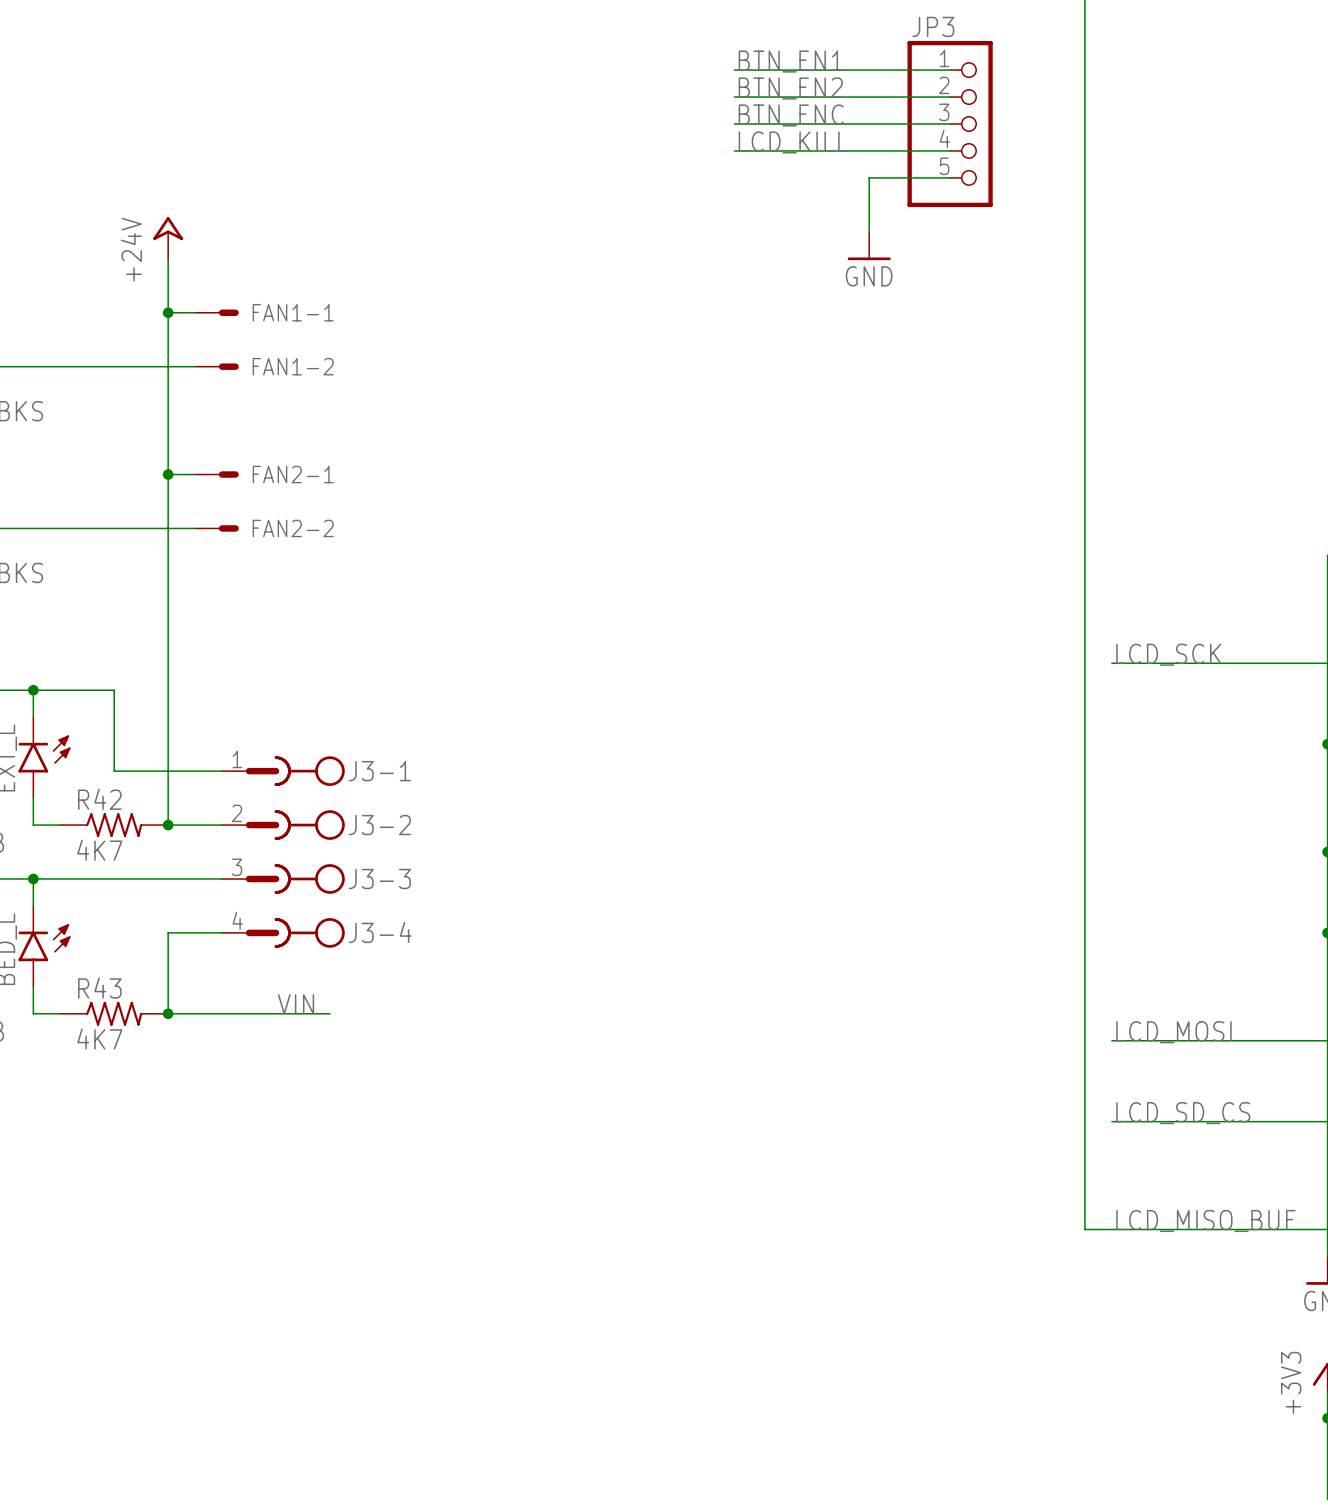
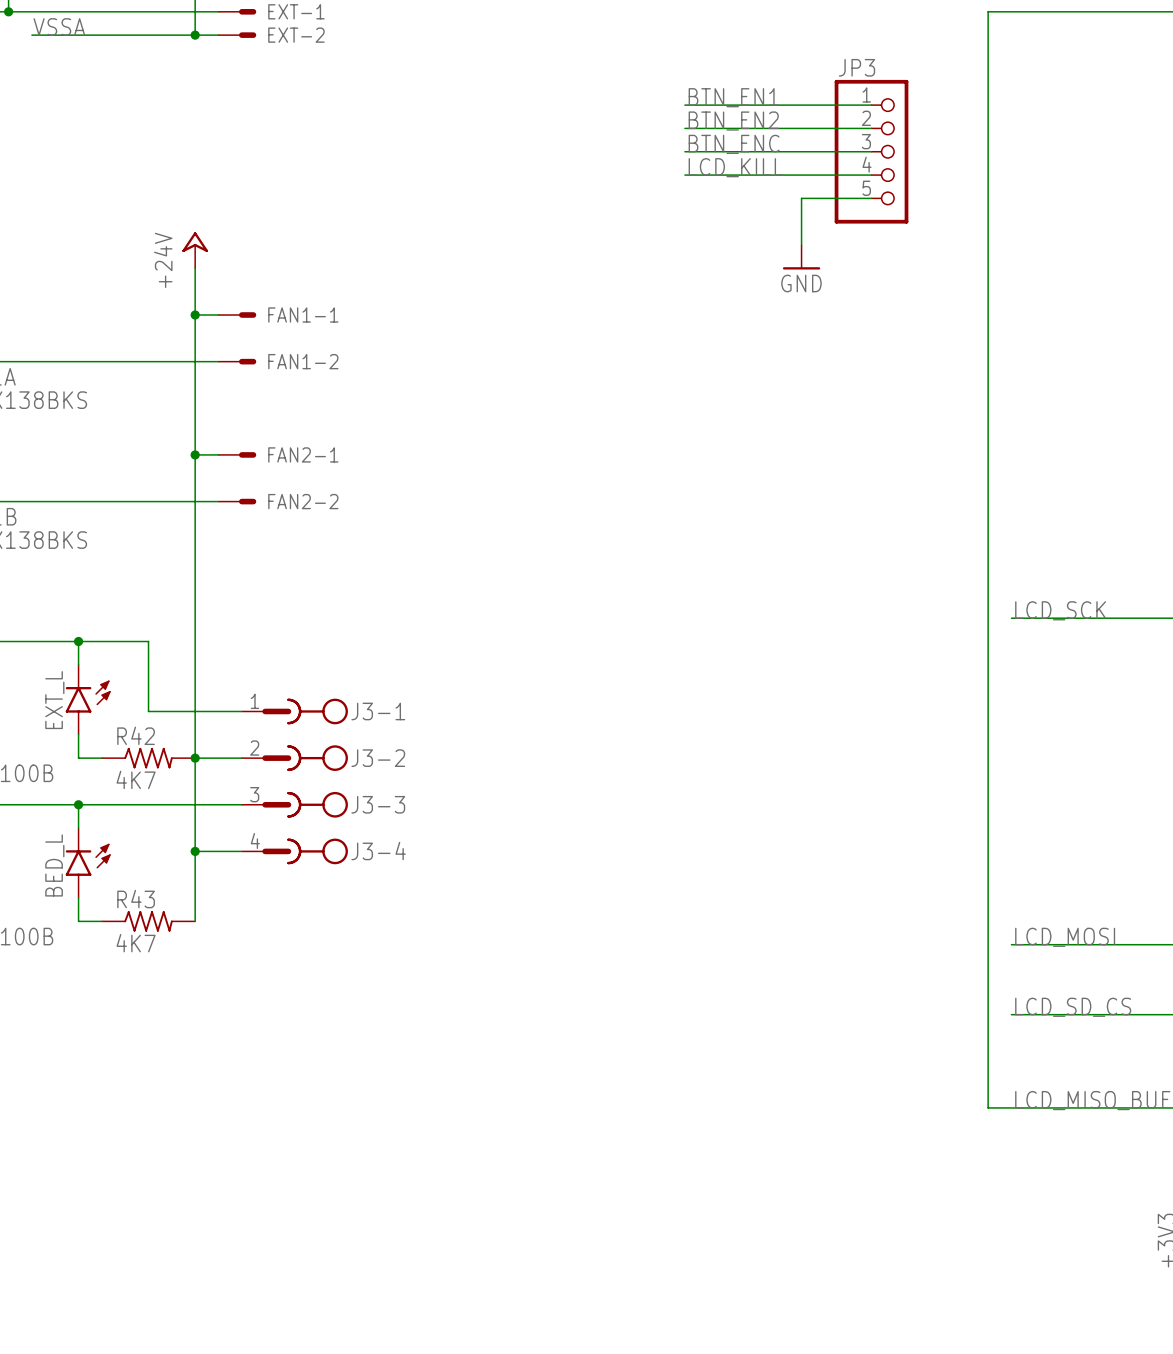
wire: none -> (195, 758) (195, 851)
junction: none -> (195, 851)
label: VIN (296, 1004) -> none
wire: (168, 1013) (329, 1013) -> none
junction: (168, 1013) -> none

